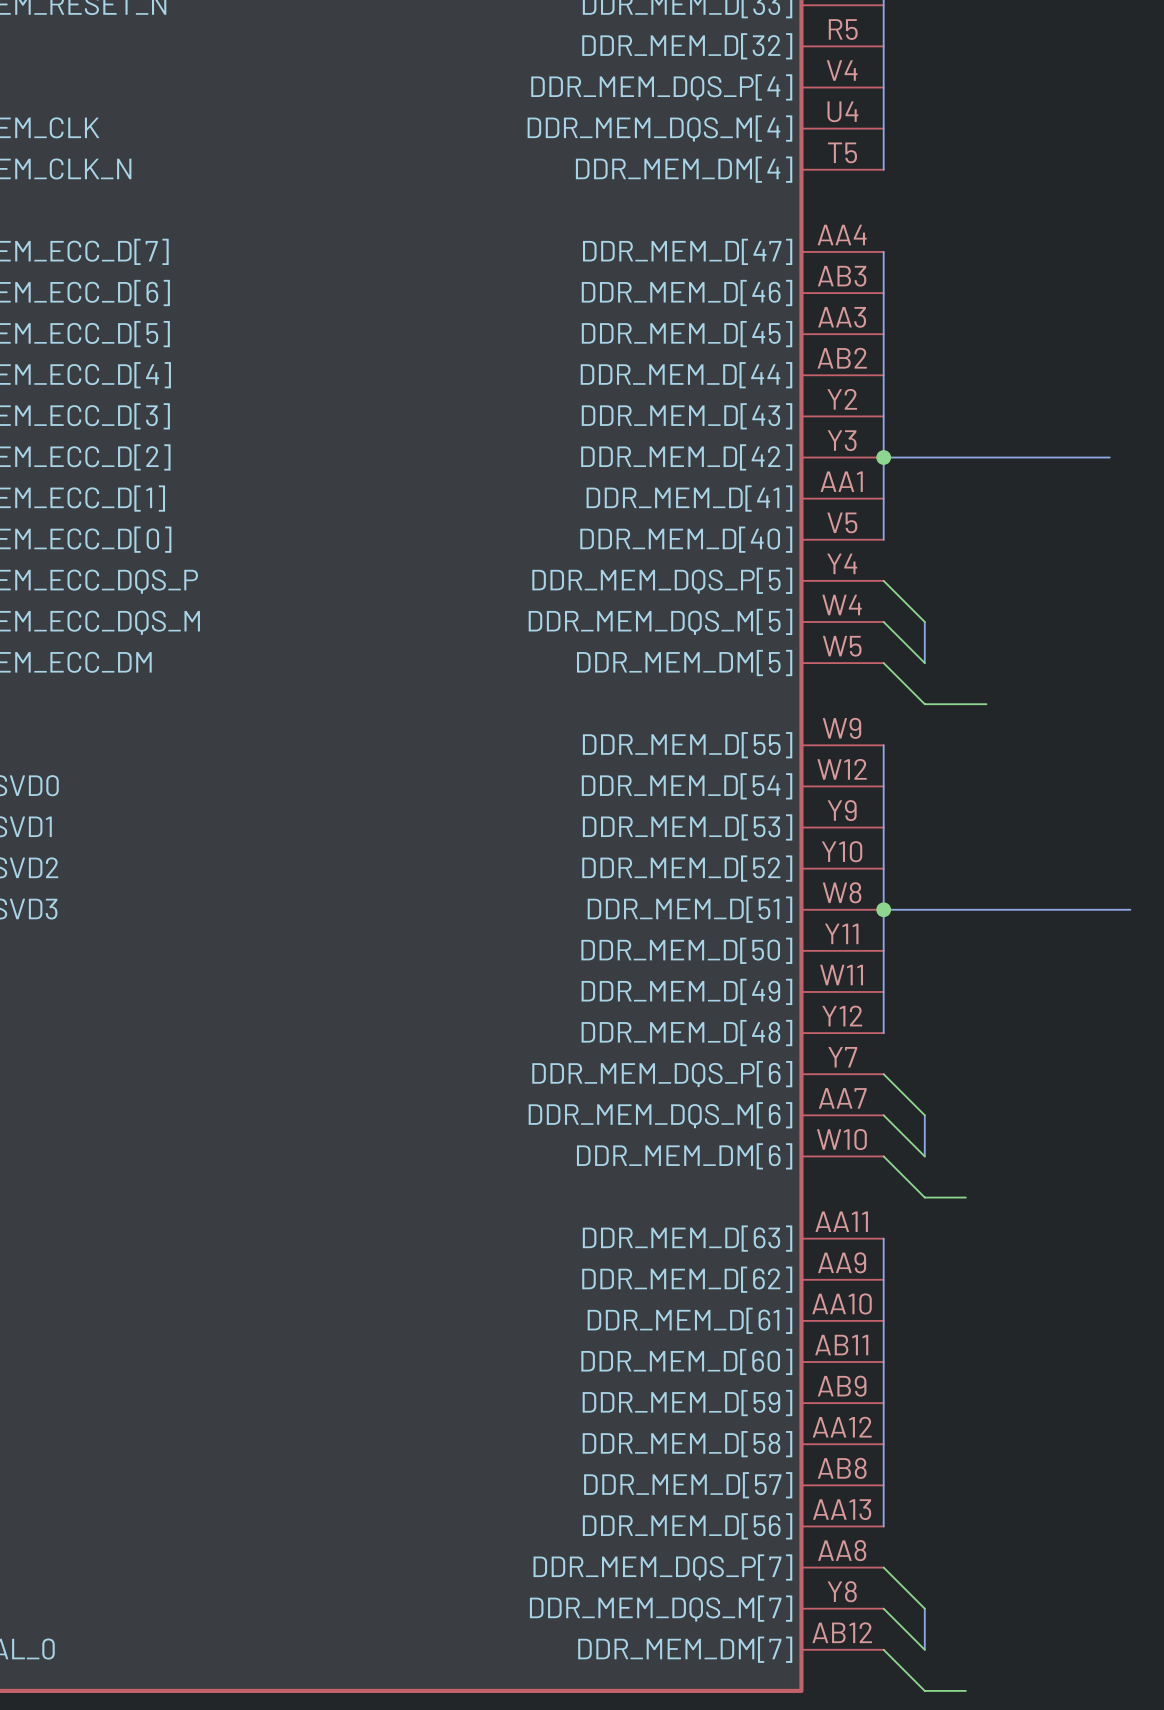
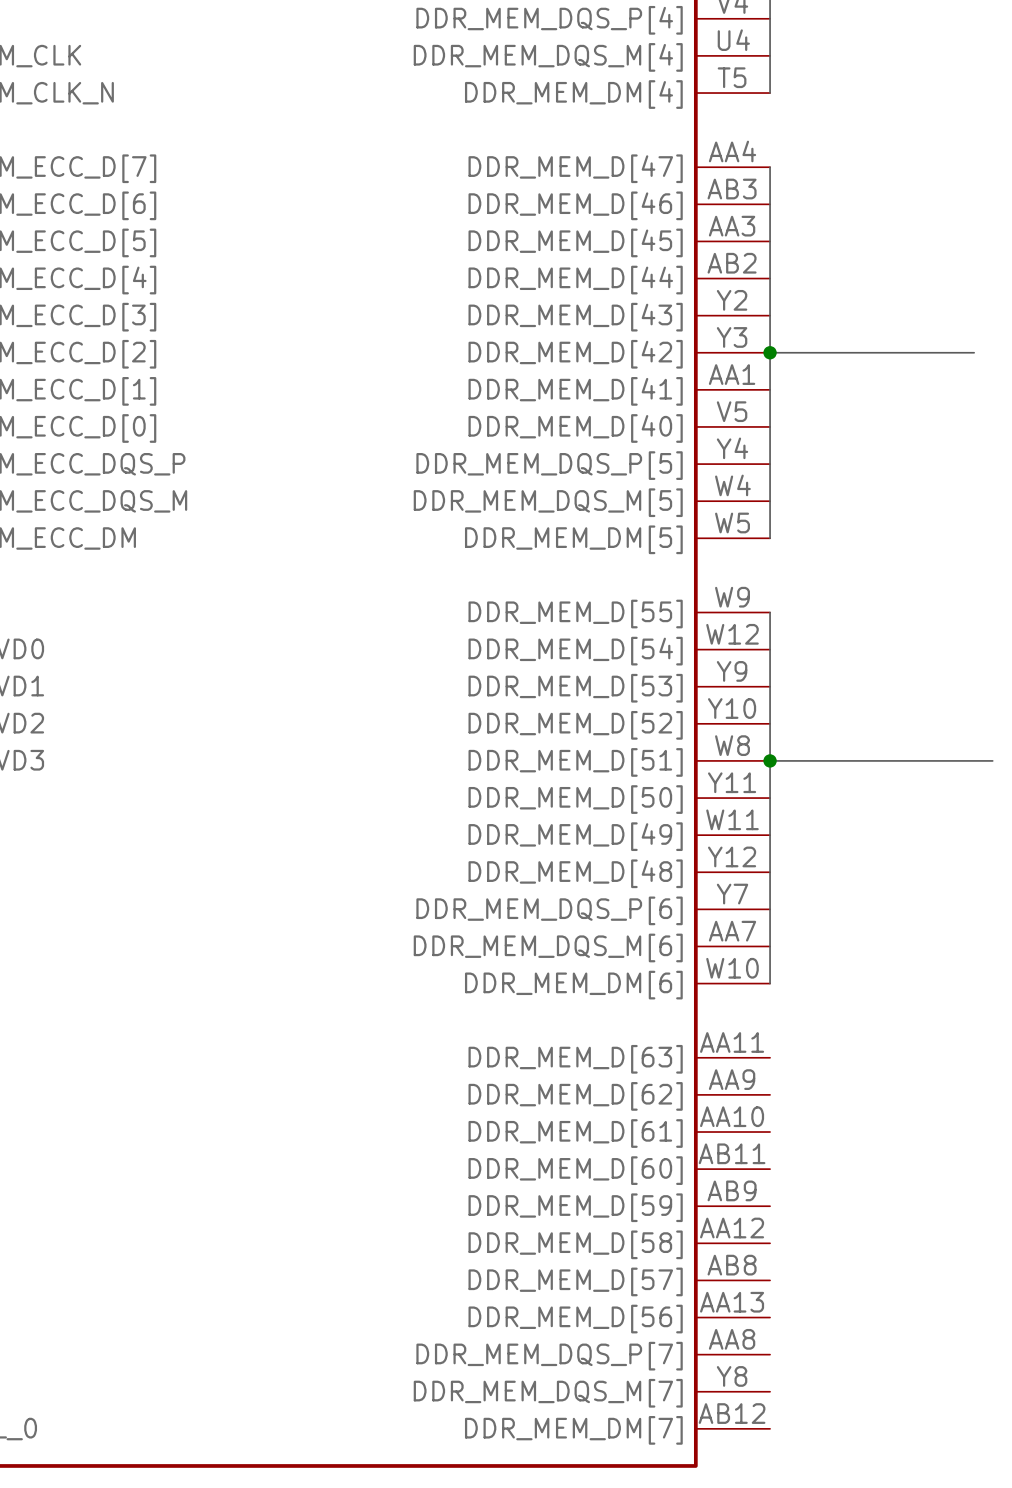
bus: none -> (770, 426) (770, 538)
wire: (883, 580) (924, 621) -> none
wire: (883, 621) (924, 663) -> none
bus: (924, 621) (924, 663) -> none
wire: (883, 663) (924, 704) (986, 704) -> none
bus: none -> (770, 872) (770, 983)
wire: (883, 1074) (924, 1115) -> none
wire: (883, 1115) (924, 1156) -> none
bus: (924, 1115) (924, 1156) -> none
wire: (883, 1156) (924, 1197) (965, 1197) -> none
bus: (883, 1238) (883, 1526) -> none
wire: (883, 1567) (924, 1608) -> none
wire: (883, 1608) (924, 1649) -> none
bus: (924, 1608) (924, 1649) -> none
wire: (883, 1649) (924, 1690) (965, 1690) -> none

